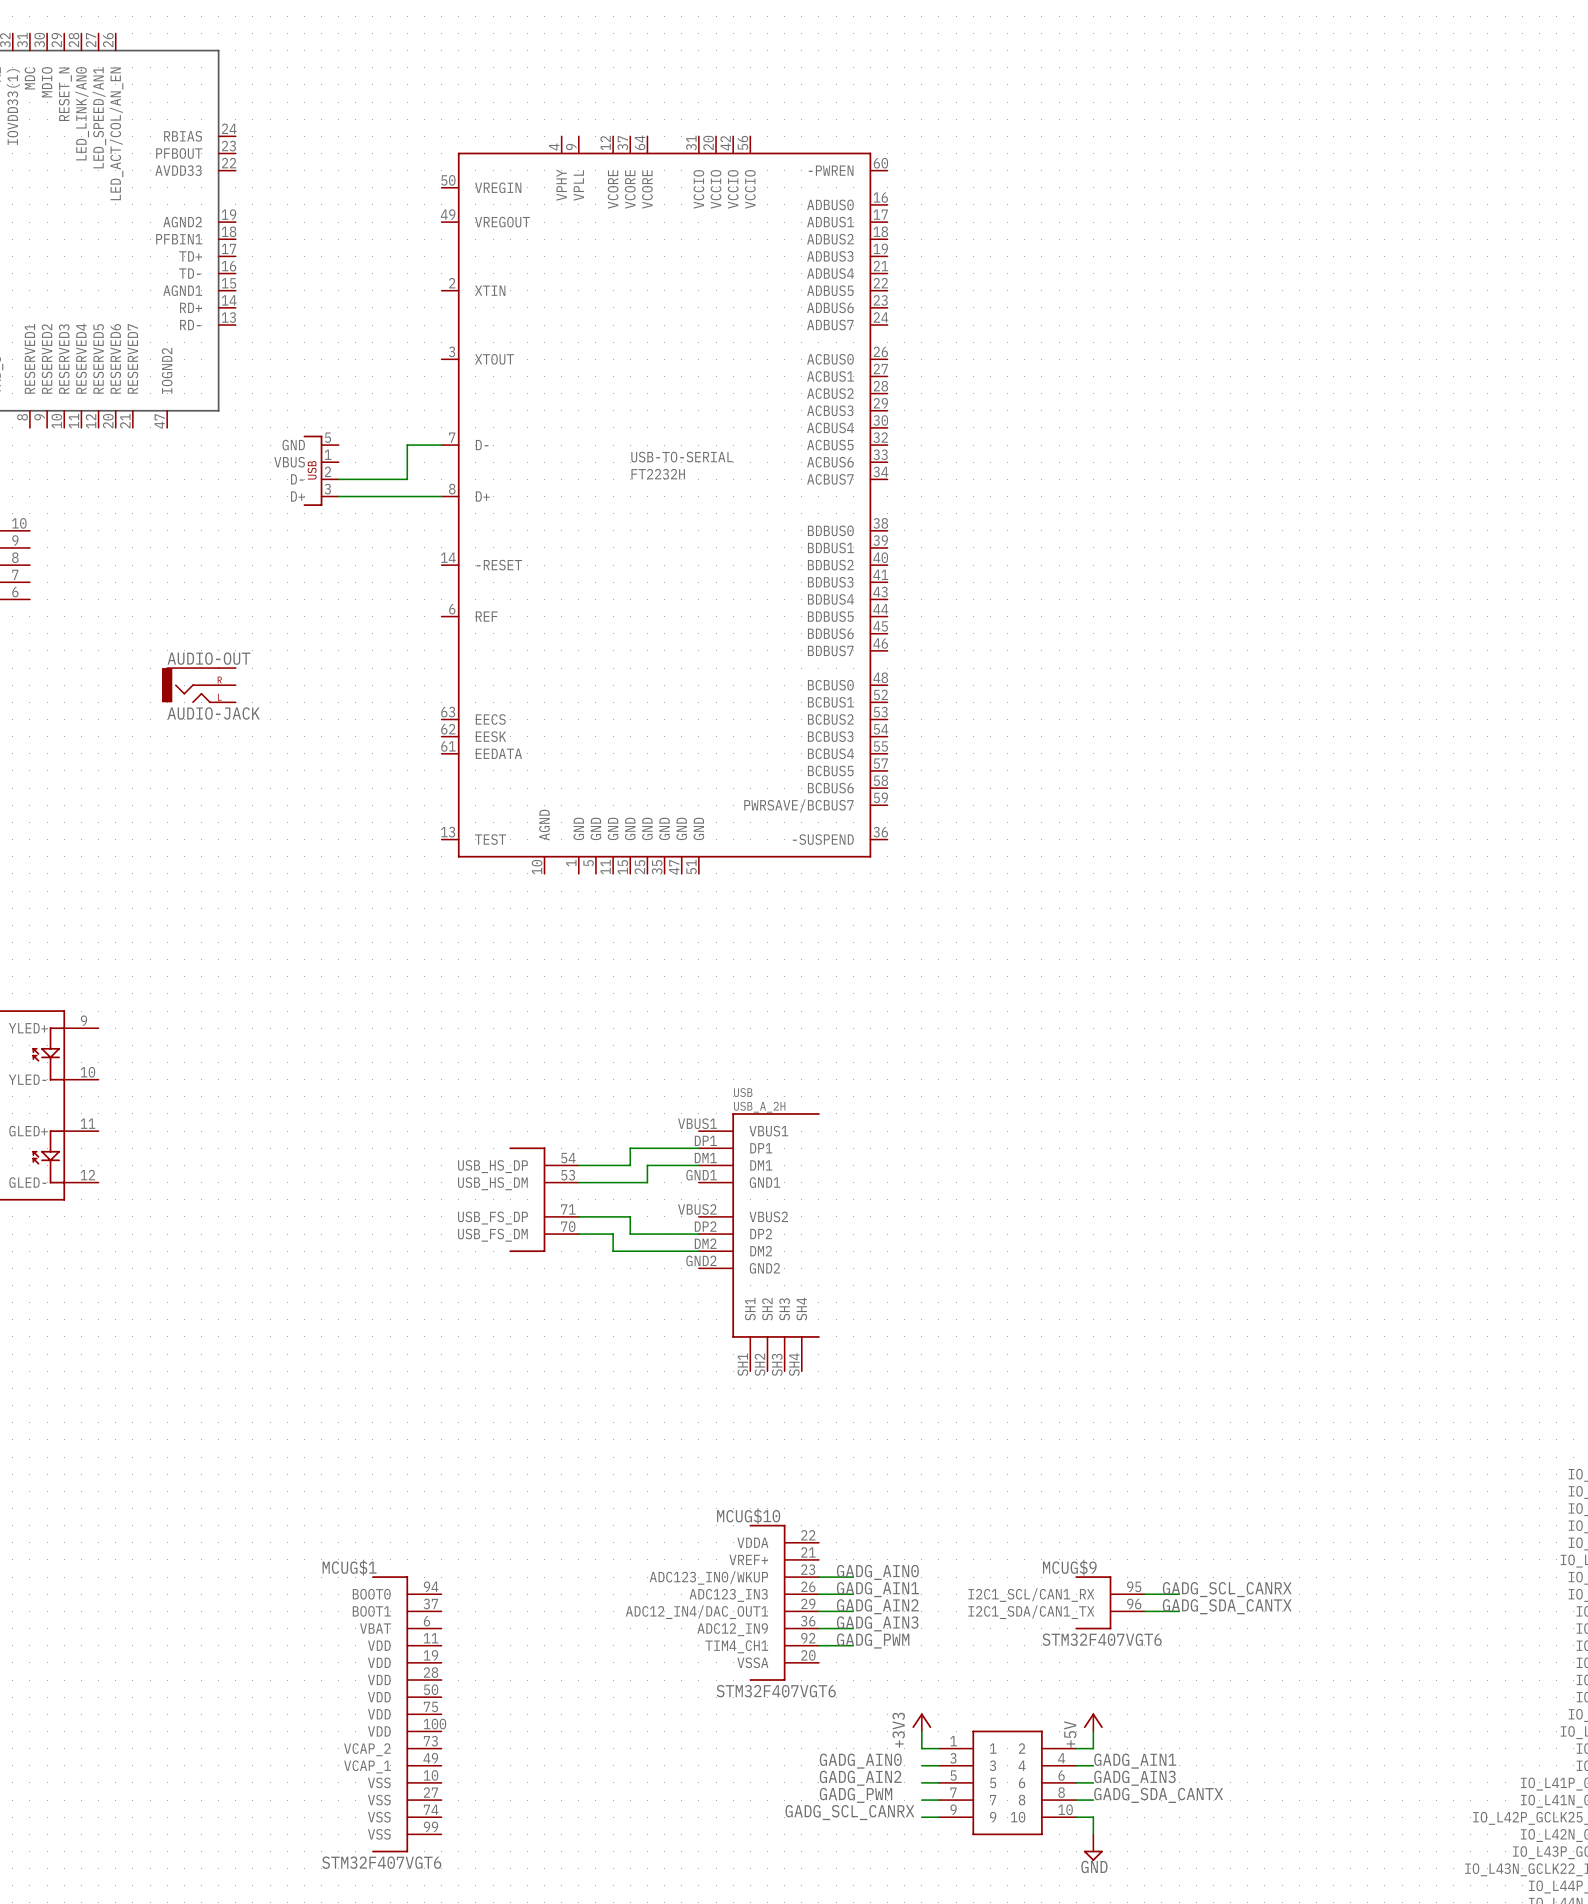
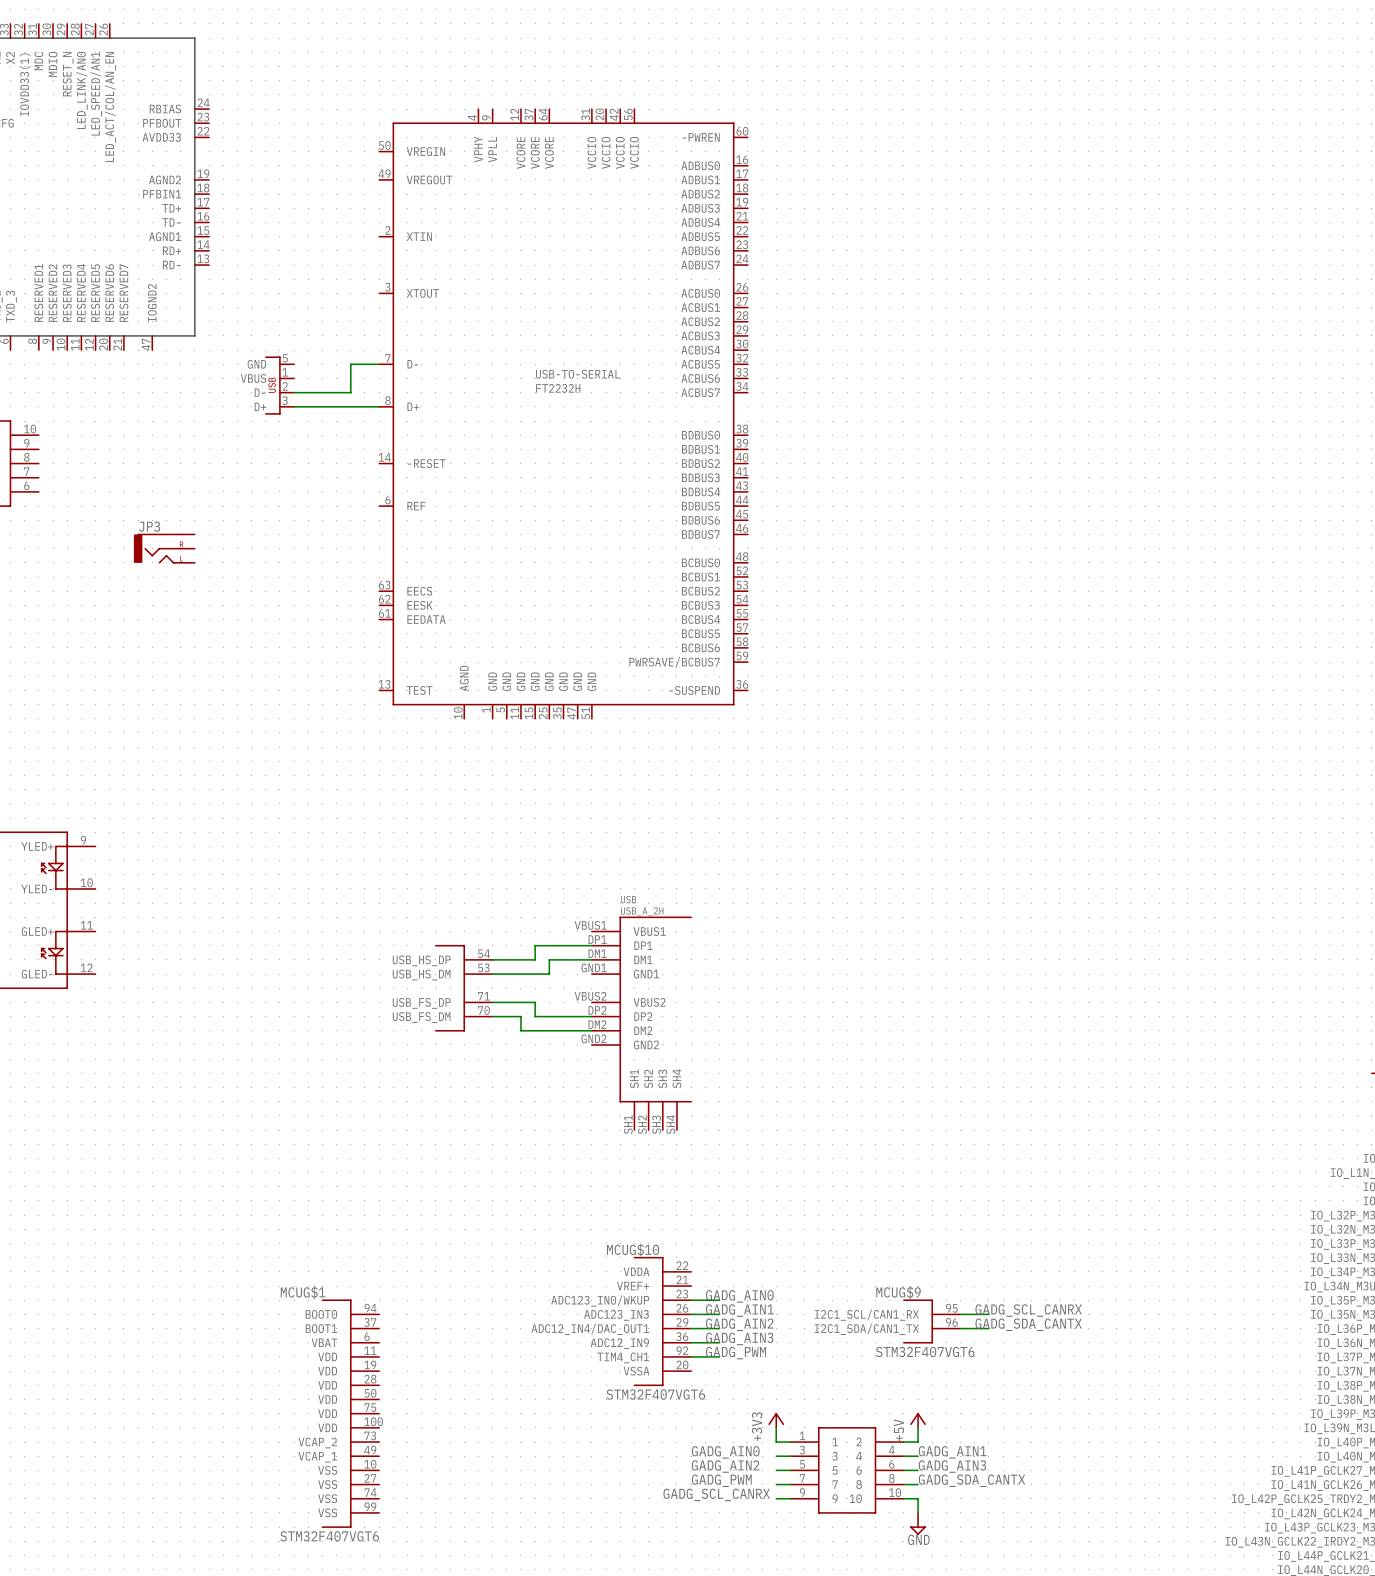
JP3: none -> (164, 548)
AUDIO-OUT: AUDIO-JACK (198, 685) -> none

